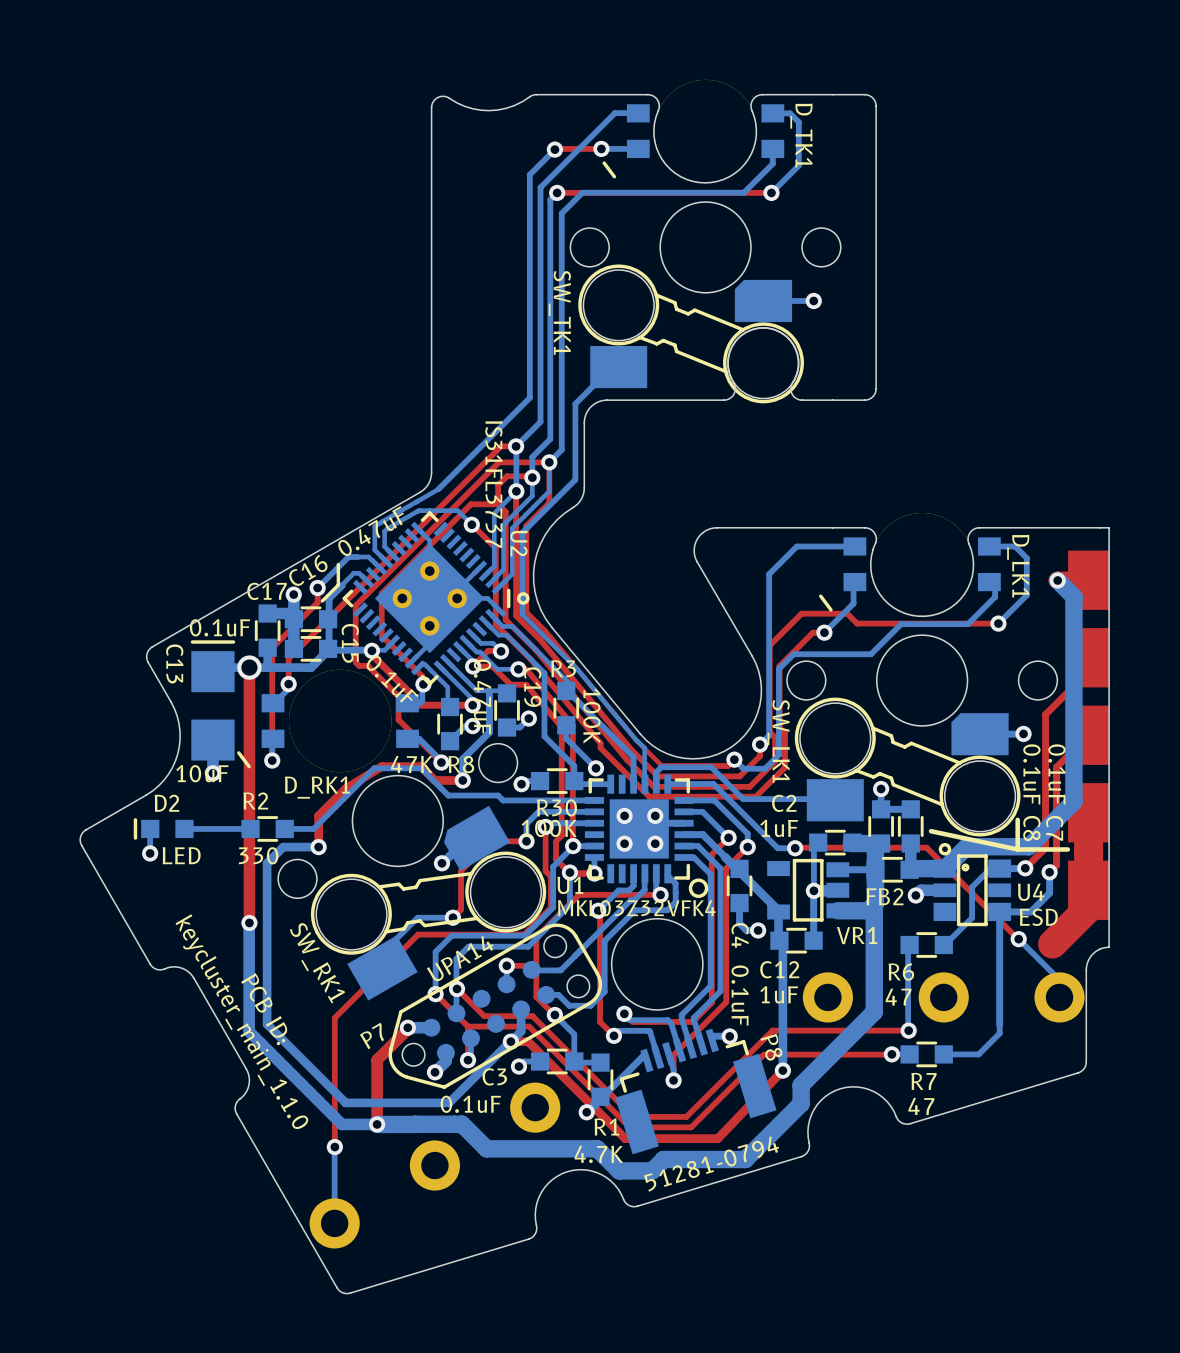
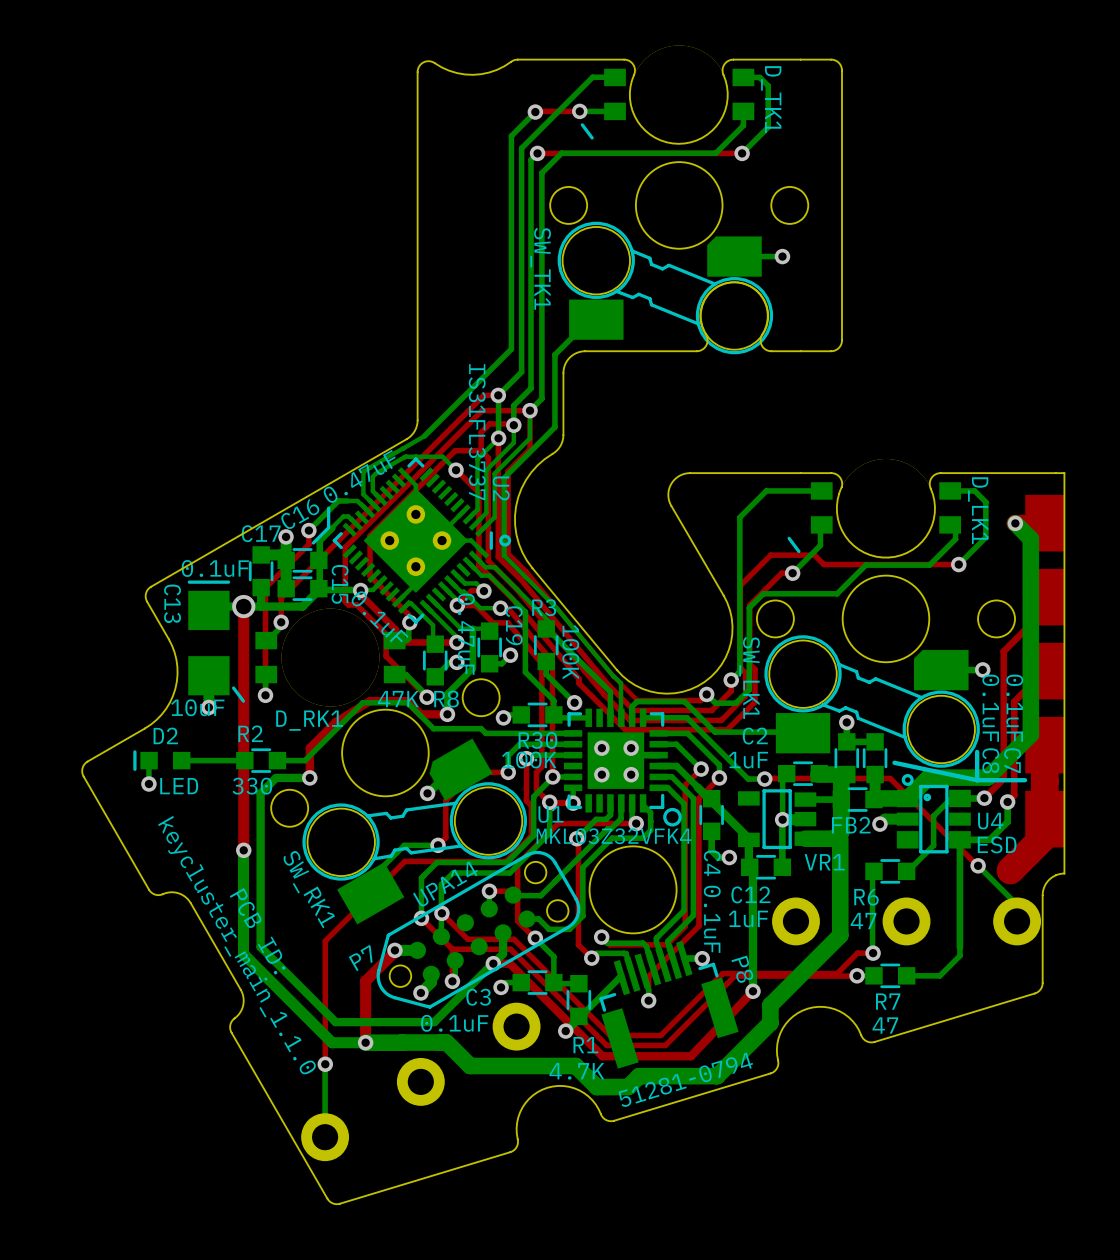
P8 footprint: [615, 1028, 777, 1155] -> [599, 940, 739, 1069]
top track: (892, 1030) (772, 1030) (751, 1052) -> (857, 953) (837, 973) (722, 973)

